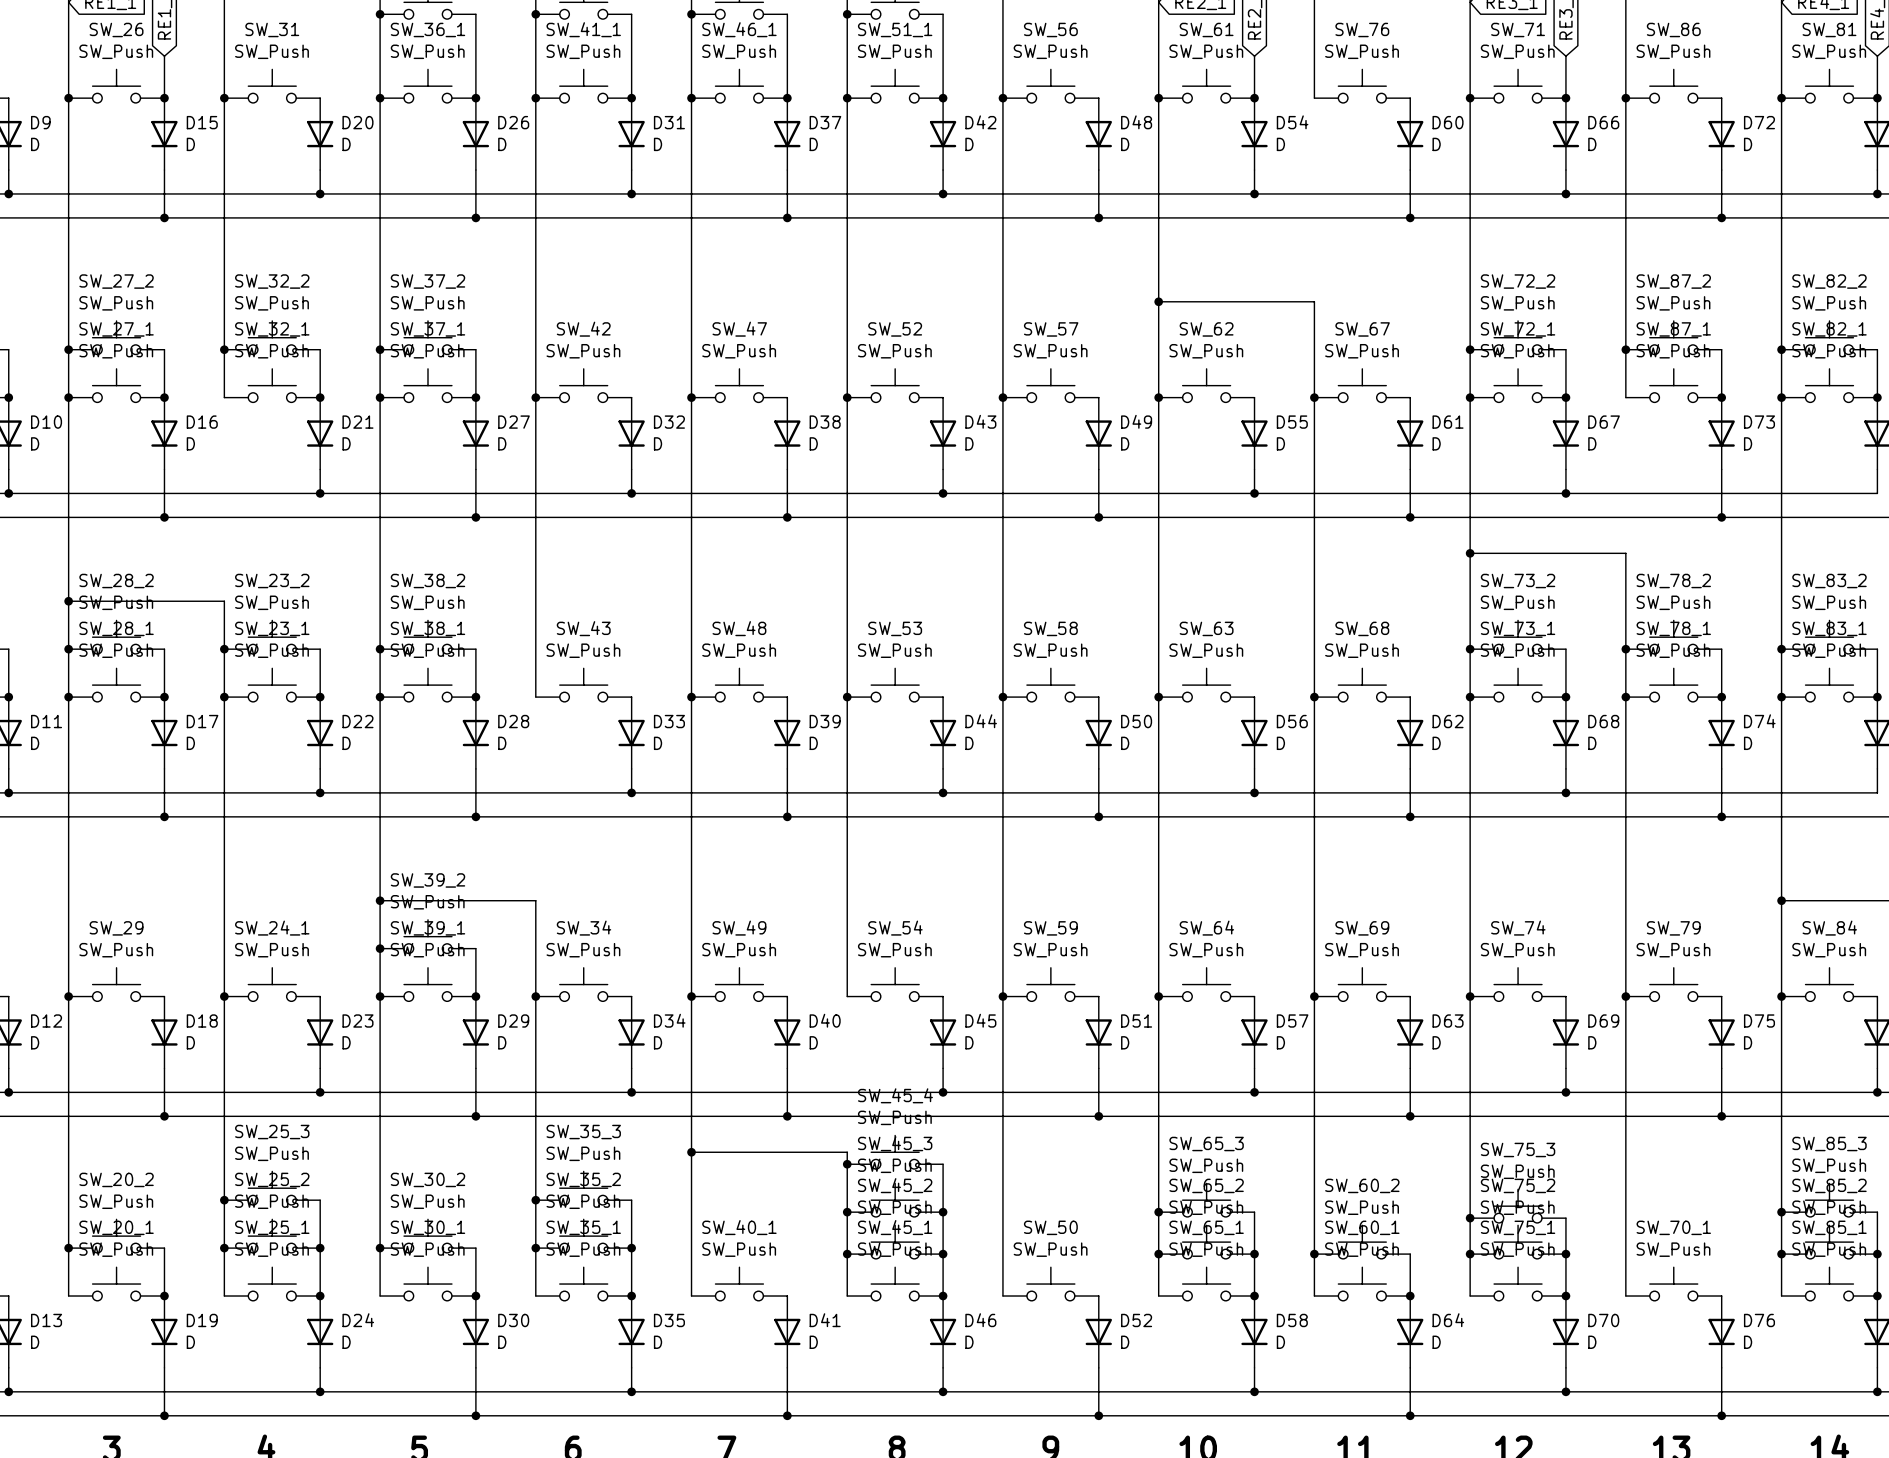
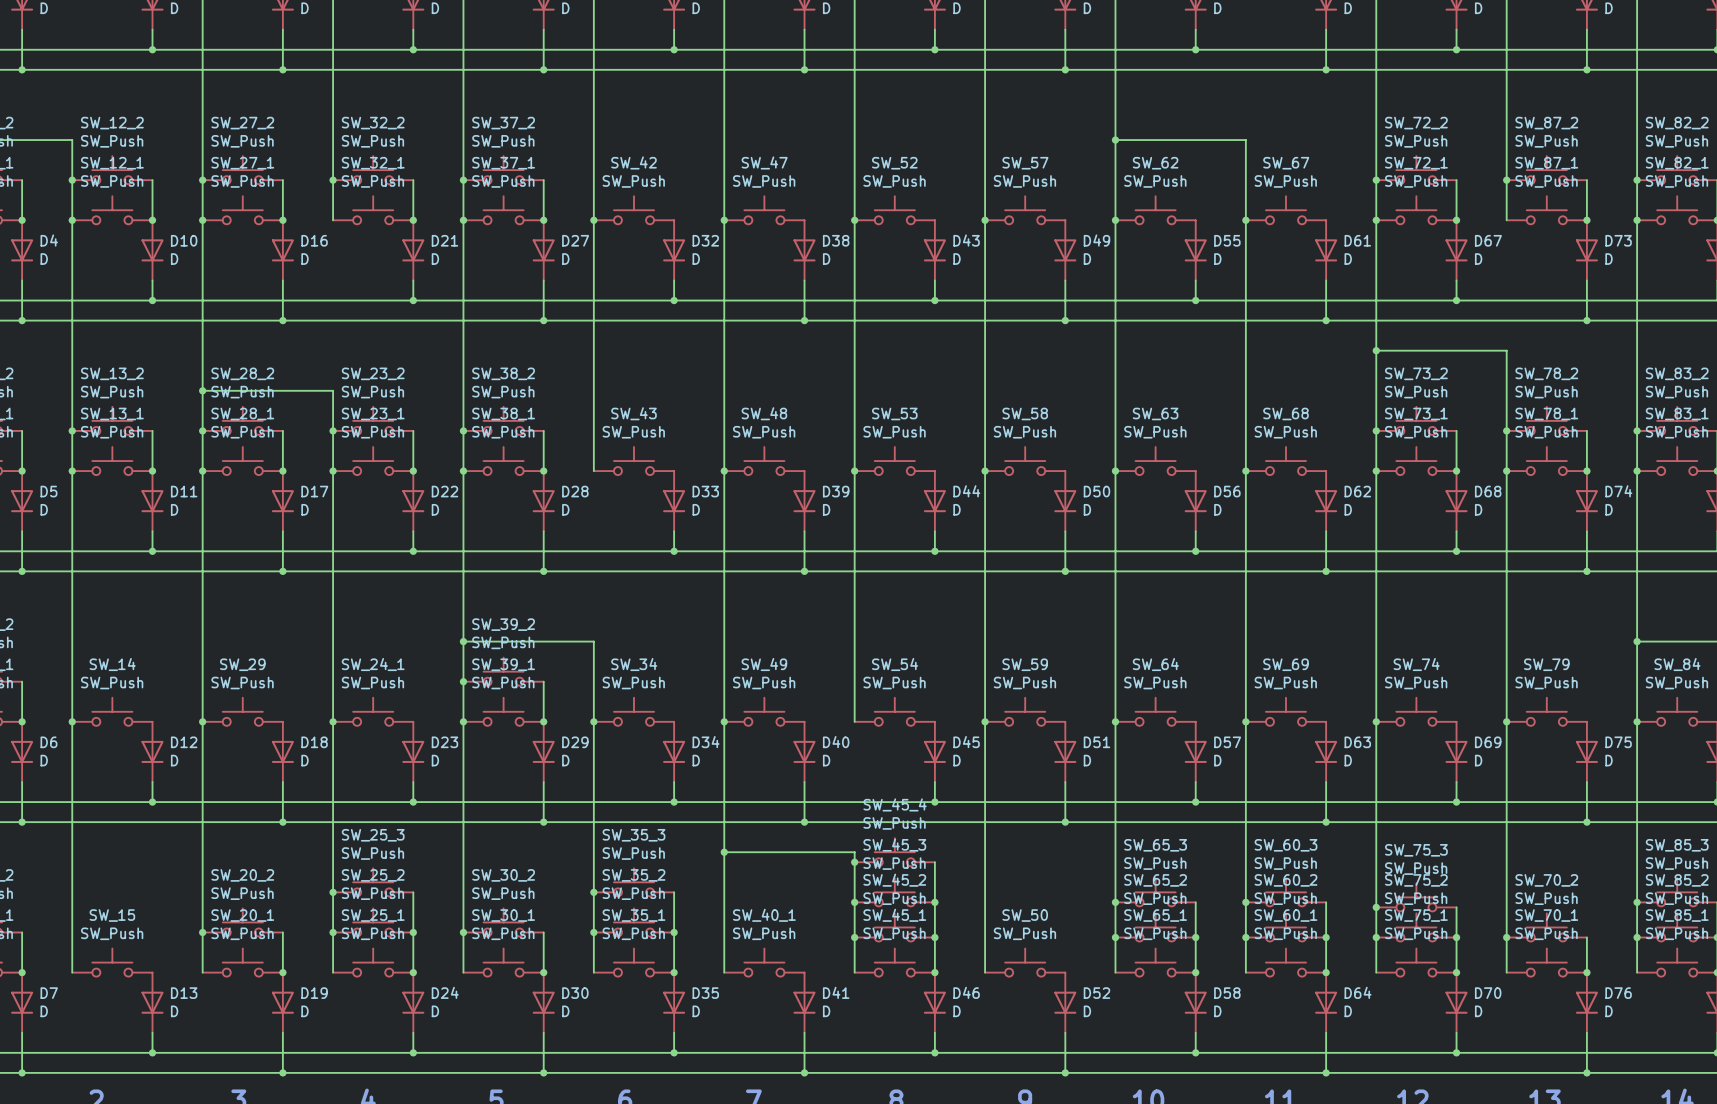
SW_60_3: none -> SW_Push (1286, 892)
junction: none -> (1245, 902)
wire: none -> (1326, 902) (1326, 937)
SW_70_2: none -> SW_Push (1546, 927)
junction: none -> (1326, 937)
junction: none -> (1506, 937)
wire: none -> (1586, 937) (1586, 972)
junction: none -> (1586, 972)

